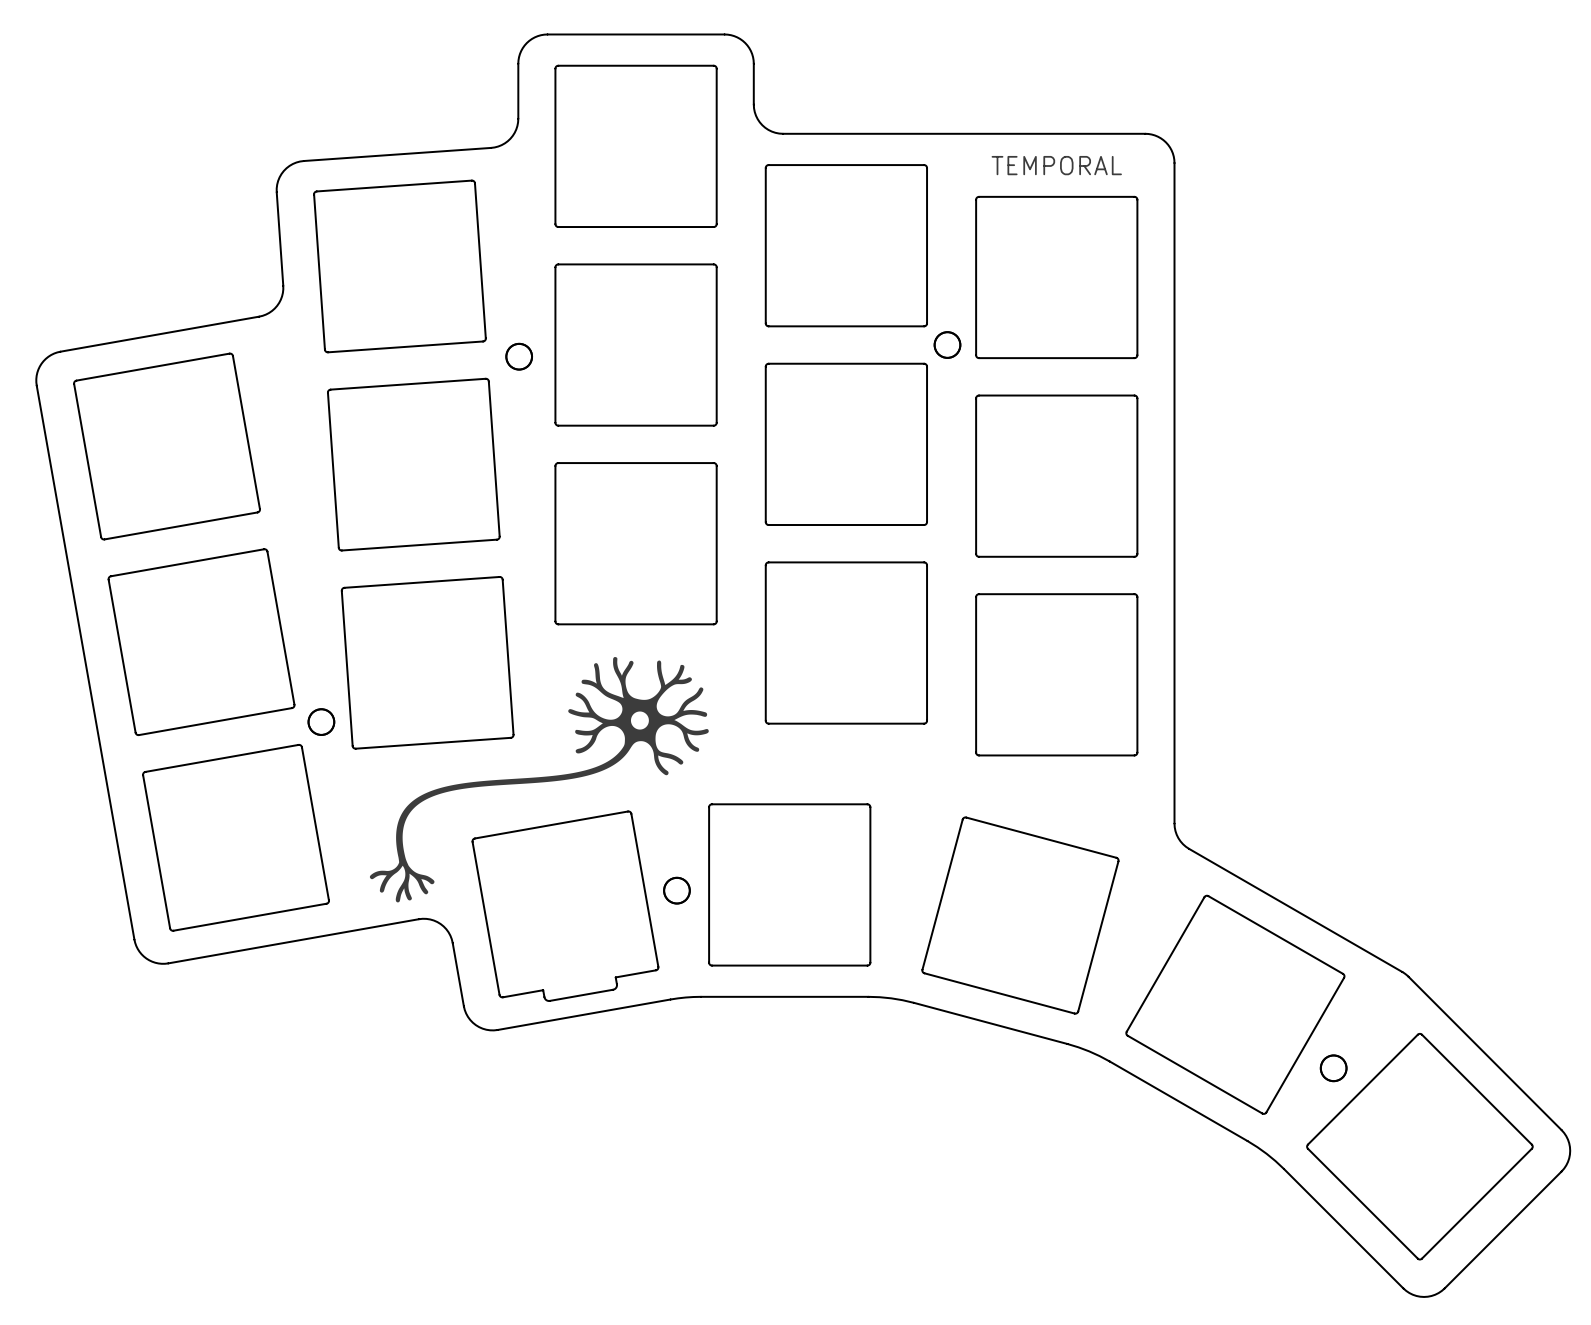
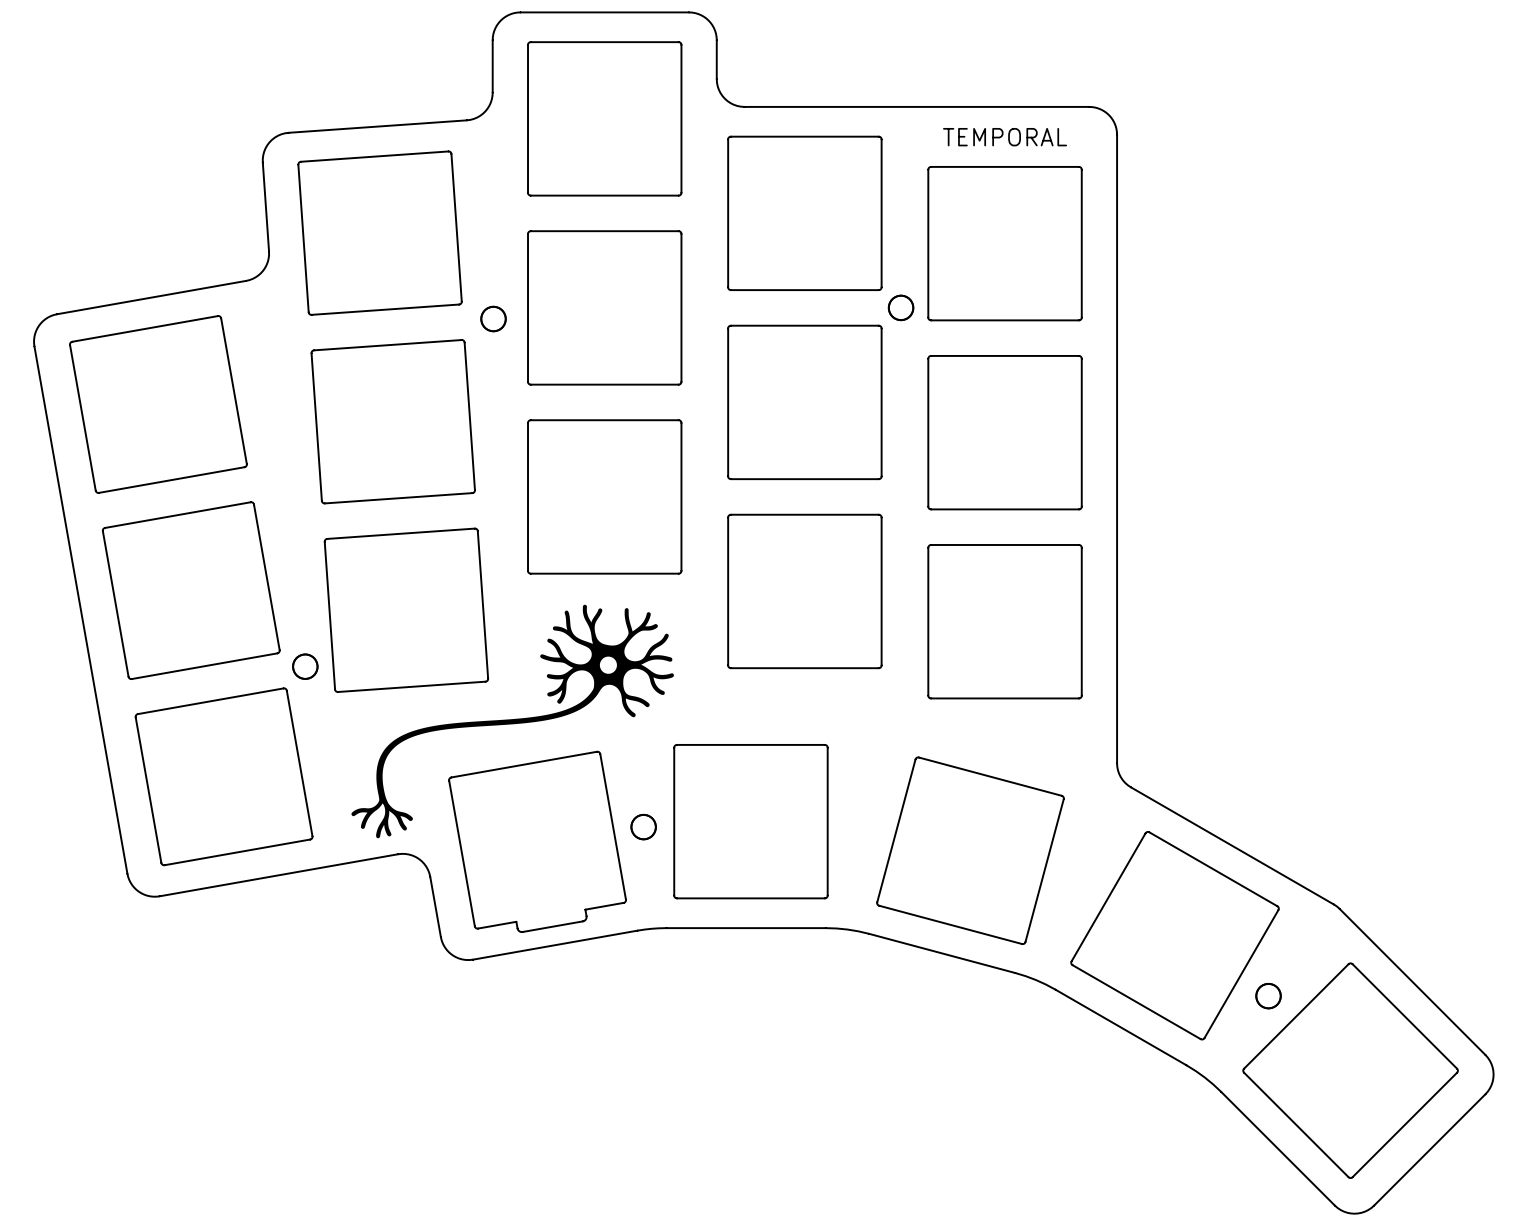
drawing shape: [369, 657, 709, 903] -> [351, 604, 674, 839]

